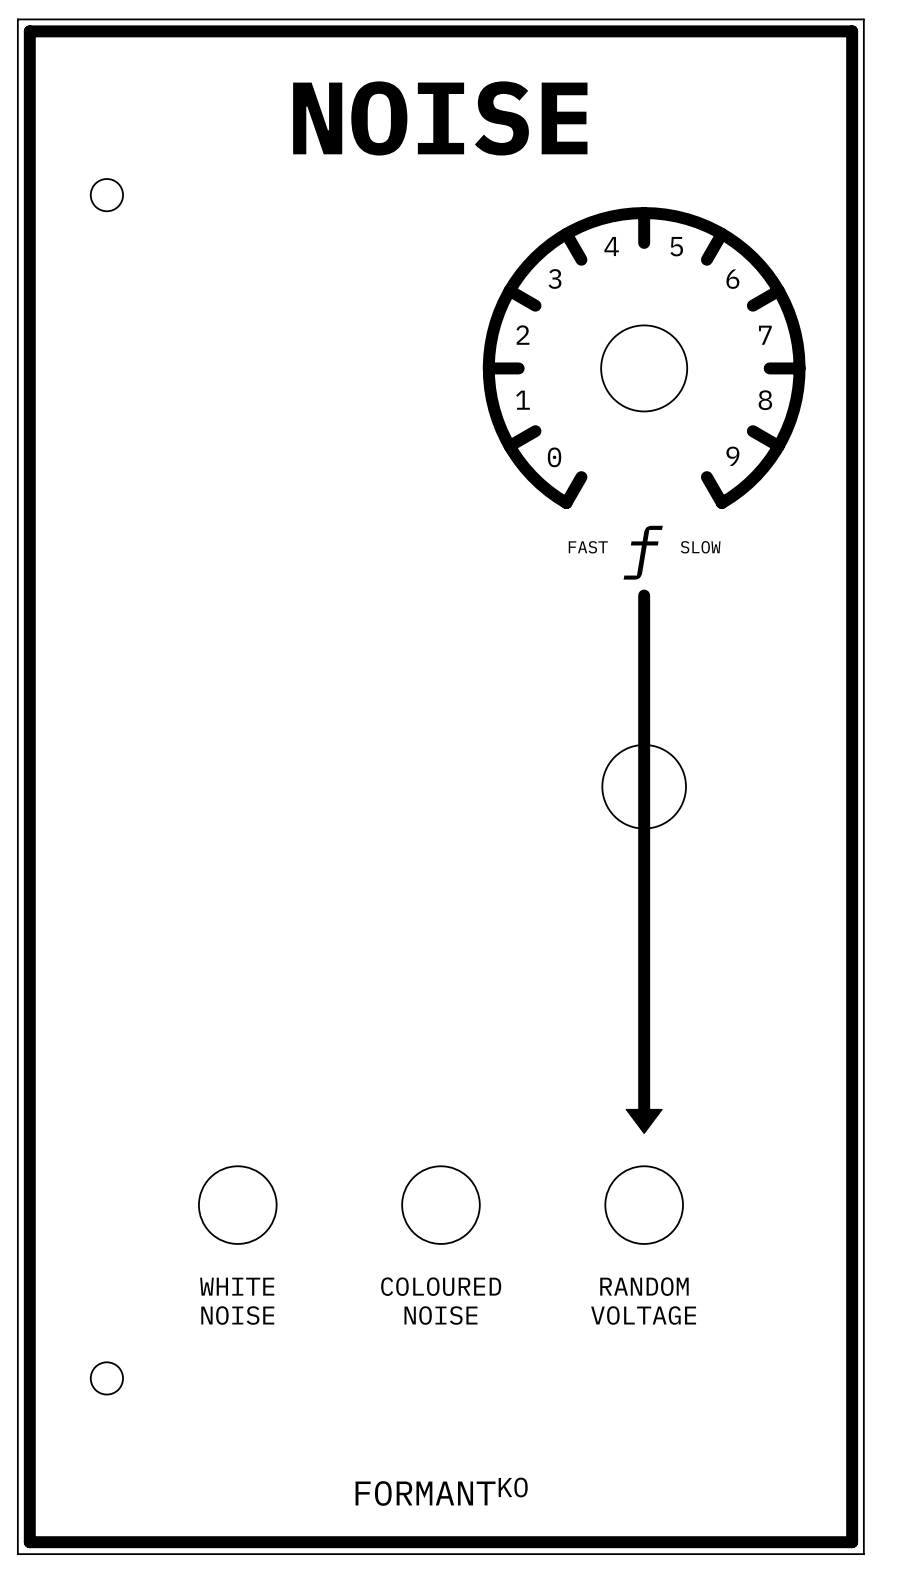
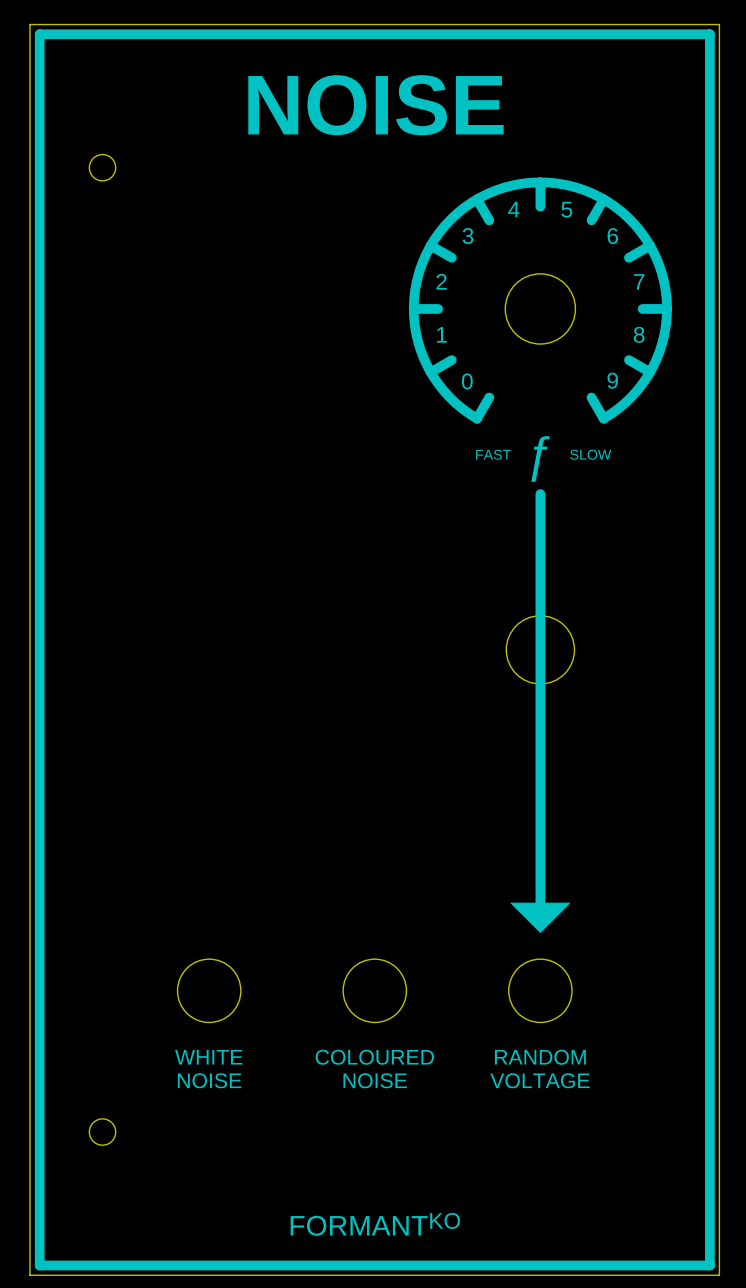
drawing shape: [625, 1108, 663, 1135] -> [510, 902, 571, 933]

